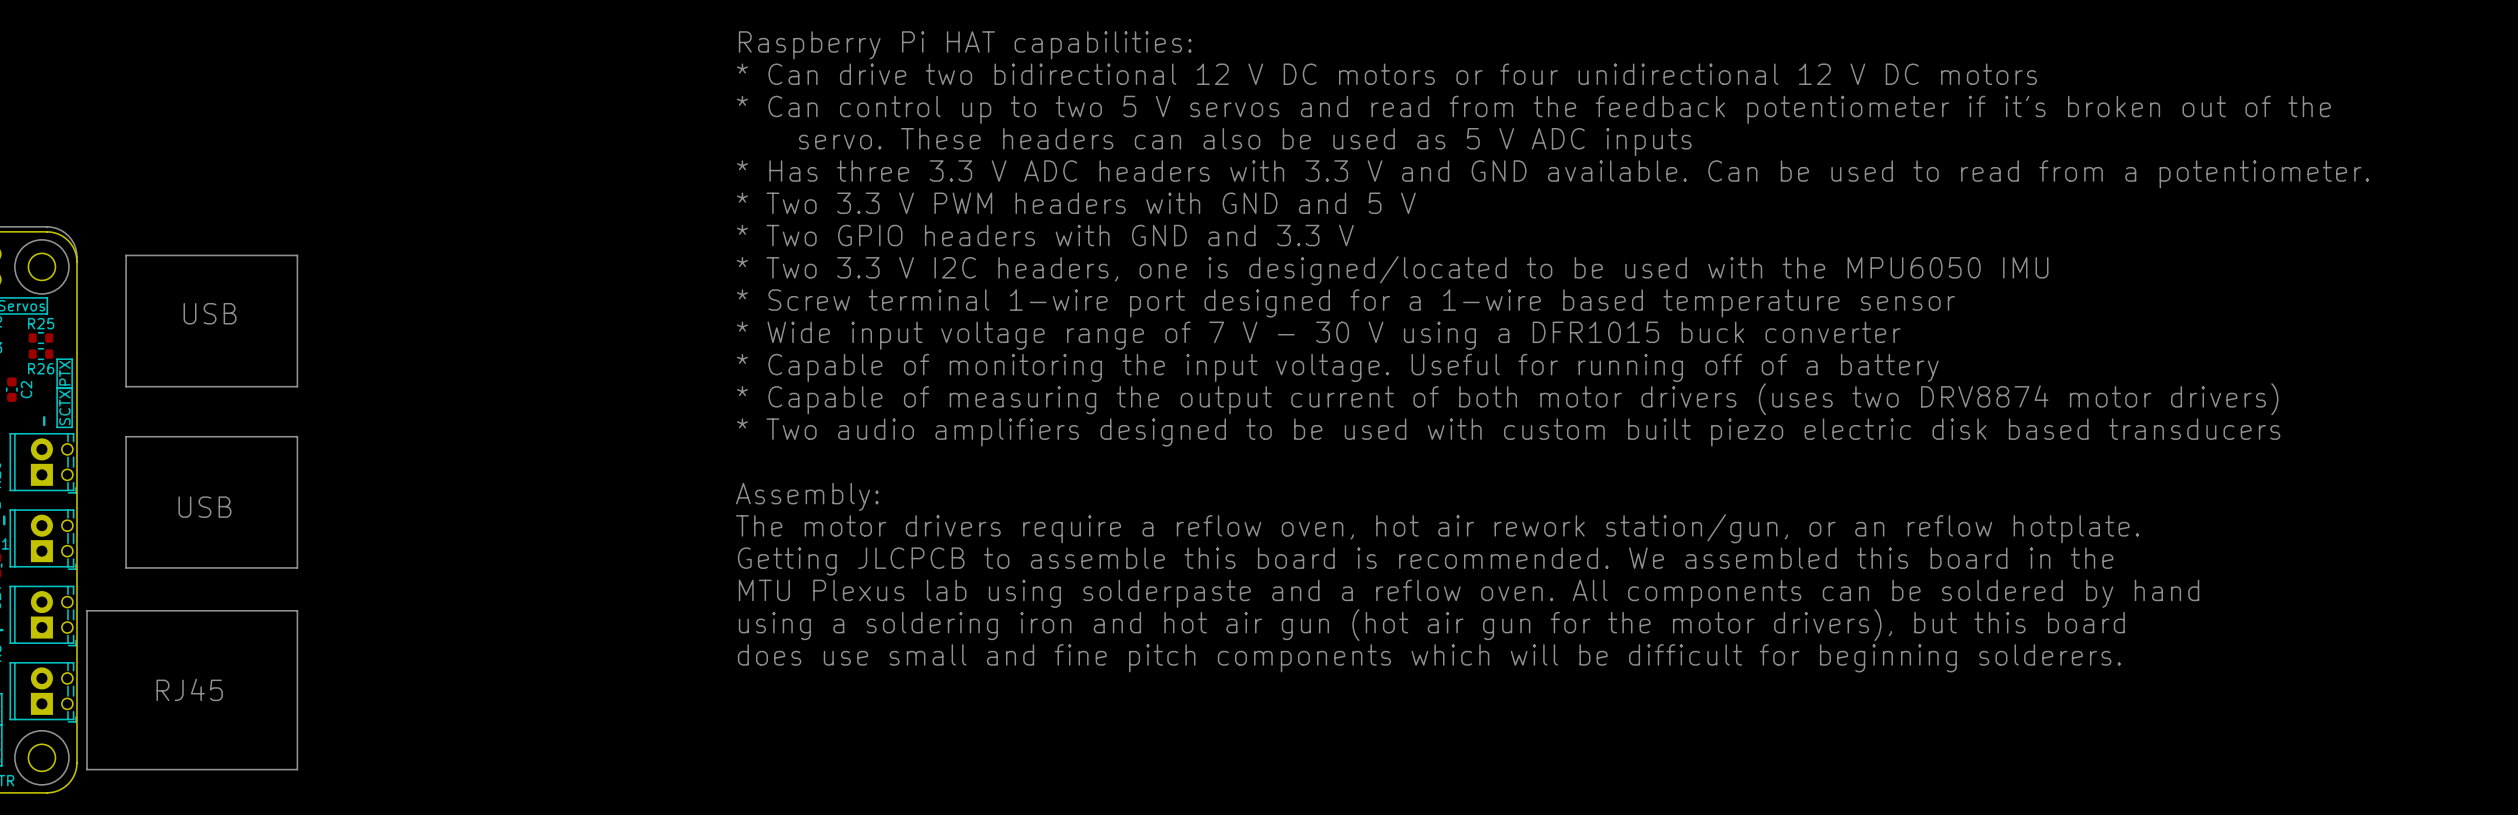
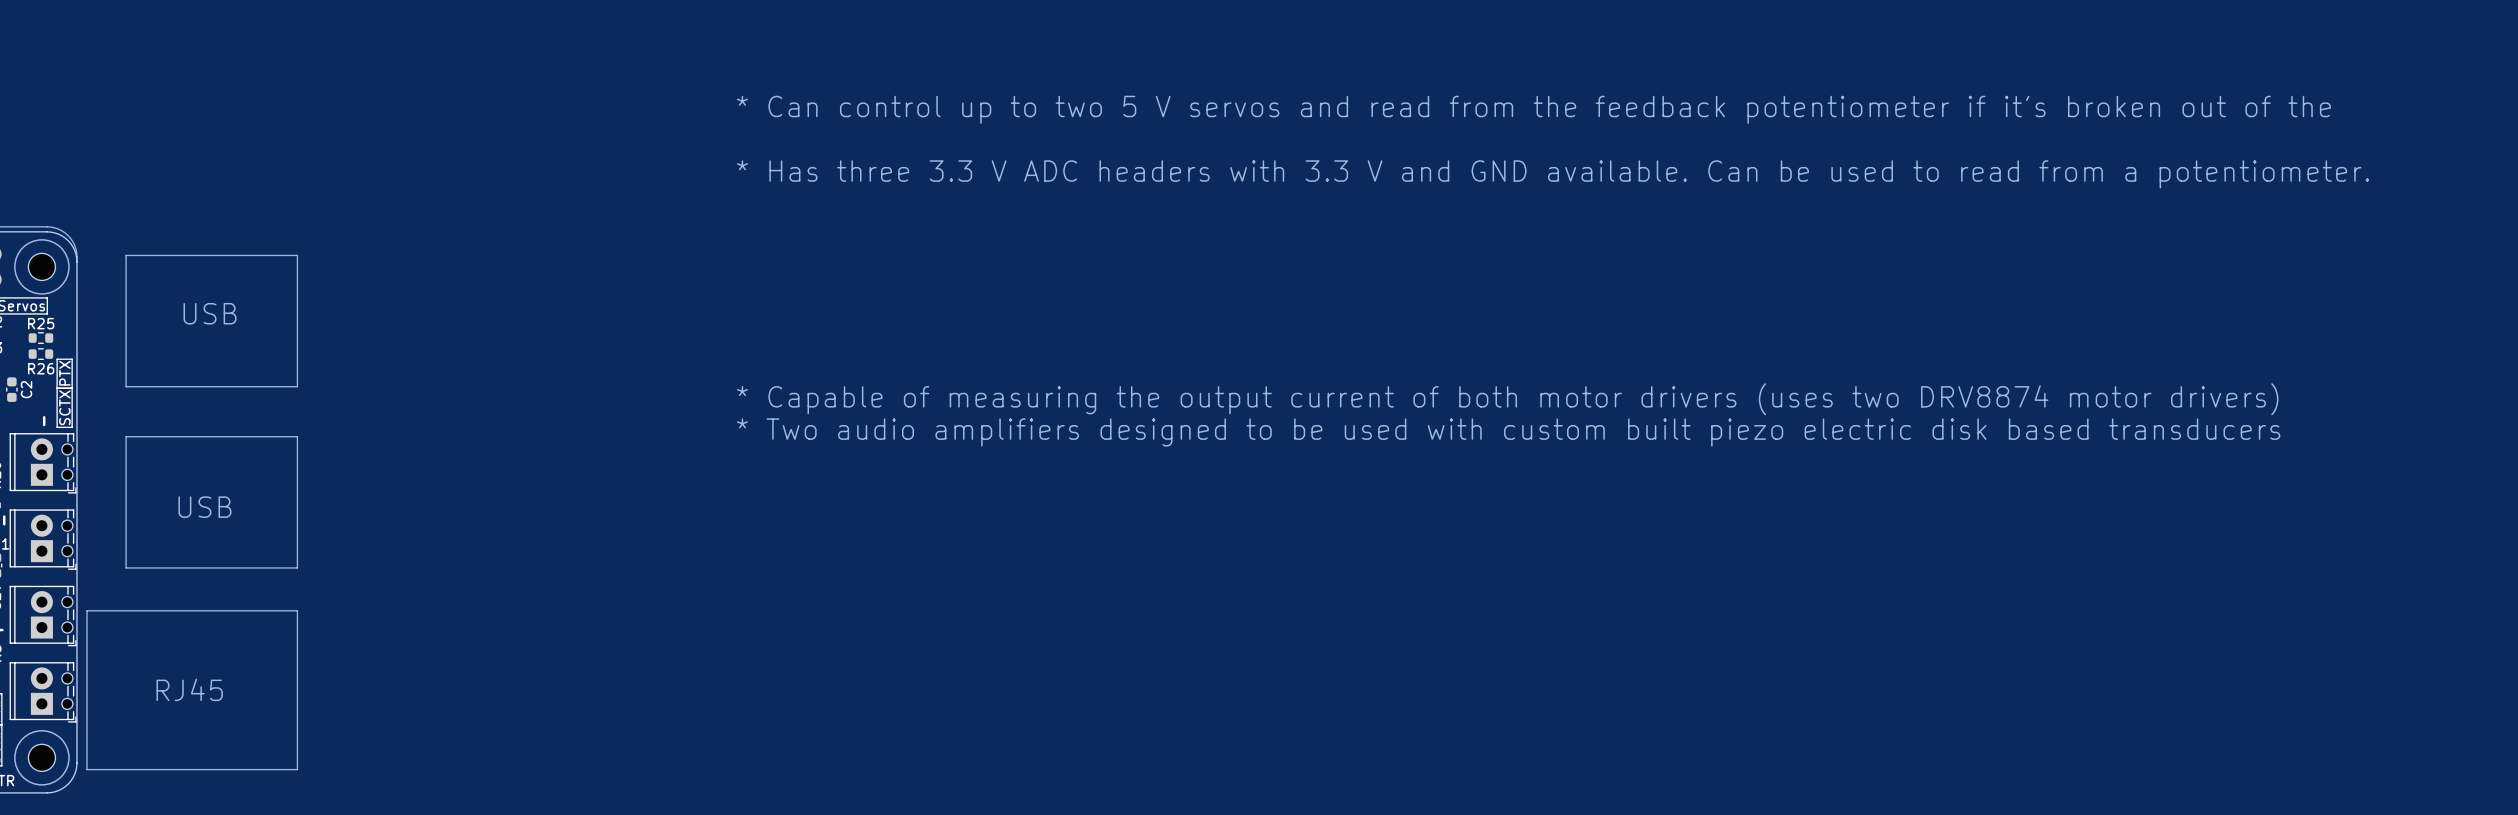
text: Raspberry Pi HAT capabilities: (965, 45) -> none
text: * Can drive two bidirectional 12 V DC motors or four unidirectional 12 V DC motors (1386, 74) -> none
text: servo. These headers can also be used as 5 V ADC inputs (1245, 142) -> none
text: * Two 3.3 V PWM headers with GND and 5 V (1076, 203) -> none
text: * Two GPIO headers with GND and 3.3 V (1045, 235) -> none
text: * Two 3.3 V I2C headers, one is designed/located to be used with the MPU6050 IMU (1392, 270) -> none
text: * Screw terminal 1-wire port designed for a 1-wire based temperature sensor (1345, 303) -> none
text: * Wide input voltage range of 7 V - 30 V using a DFR1015 buck converter (1318, 335) -> none
text: * Capable of monitoring the input voltage. Useful for running off of a battery (1337, 367) -> none
text: Assembly: (807, 496) -> none
text: The motor drivers require a reflow oven, hot air rework station/gun, or an reflow hotplate. (1437, 528) -> none
text: Getting JLCPCB to assemble this board is recommended. We assembled this board in the (1425, 561) -> none
text: MTU Plexus lab using solderpaste and a reflow oven. All components can be soldered by hand (1469, 593) -> none
text: using a soldering iron and hot air gun (hot air gun for the motor drivers), but this board (1431, 625) -> none
text: does use small and fine pitch components which will be difficult for beginning solderers. (1429, 658) -> none

